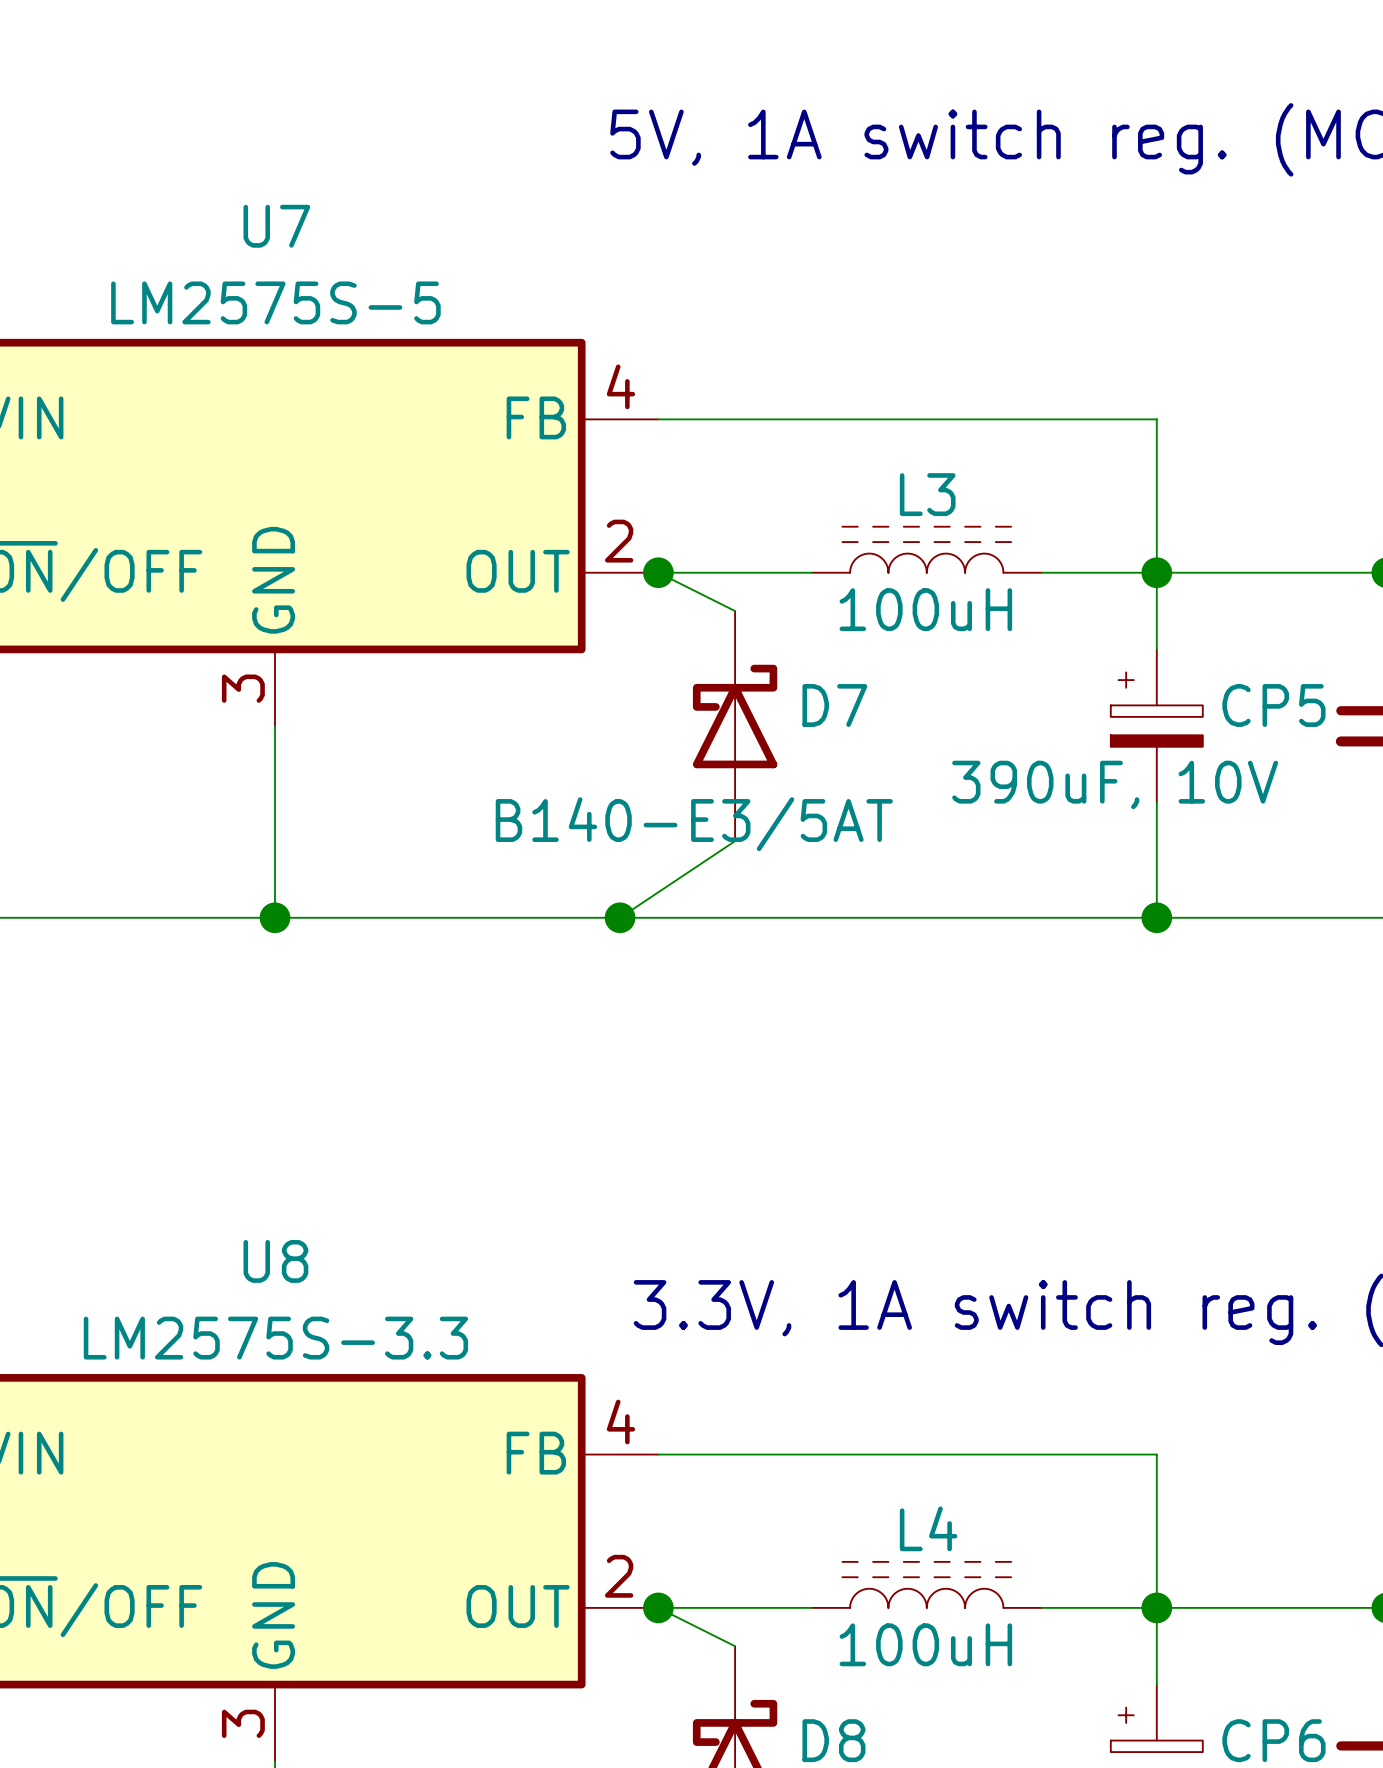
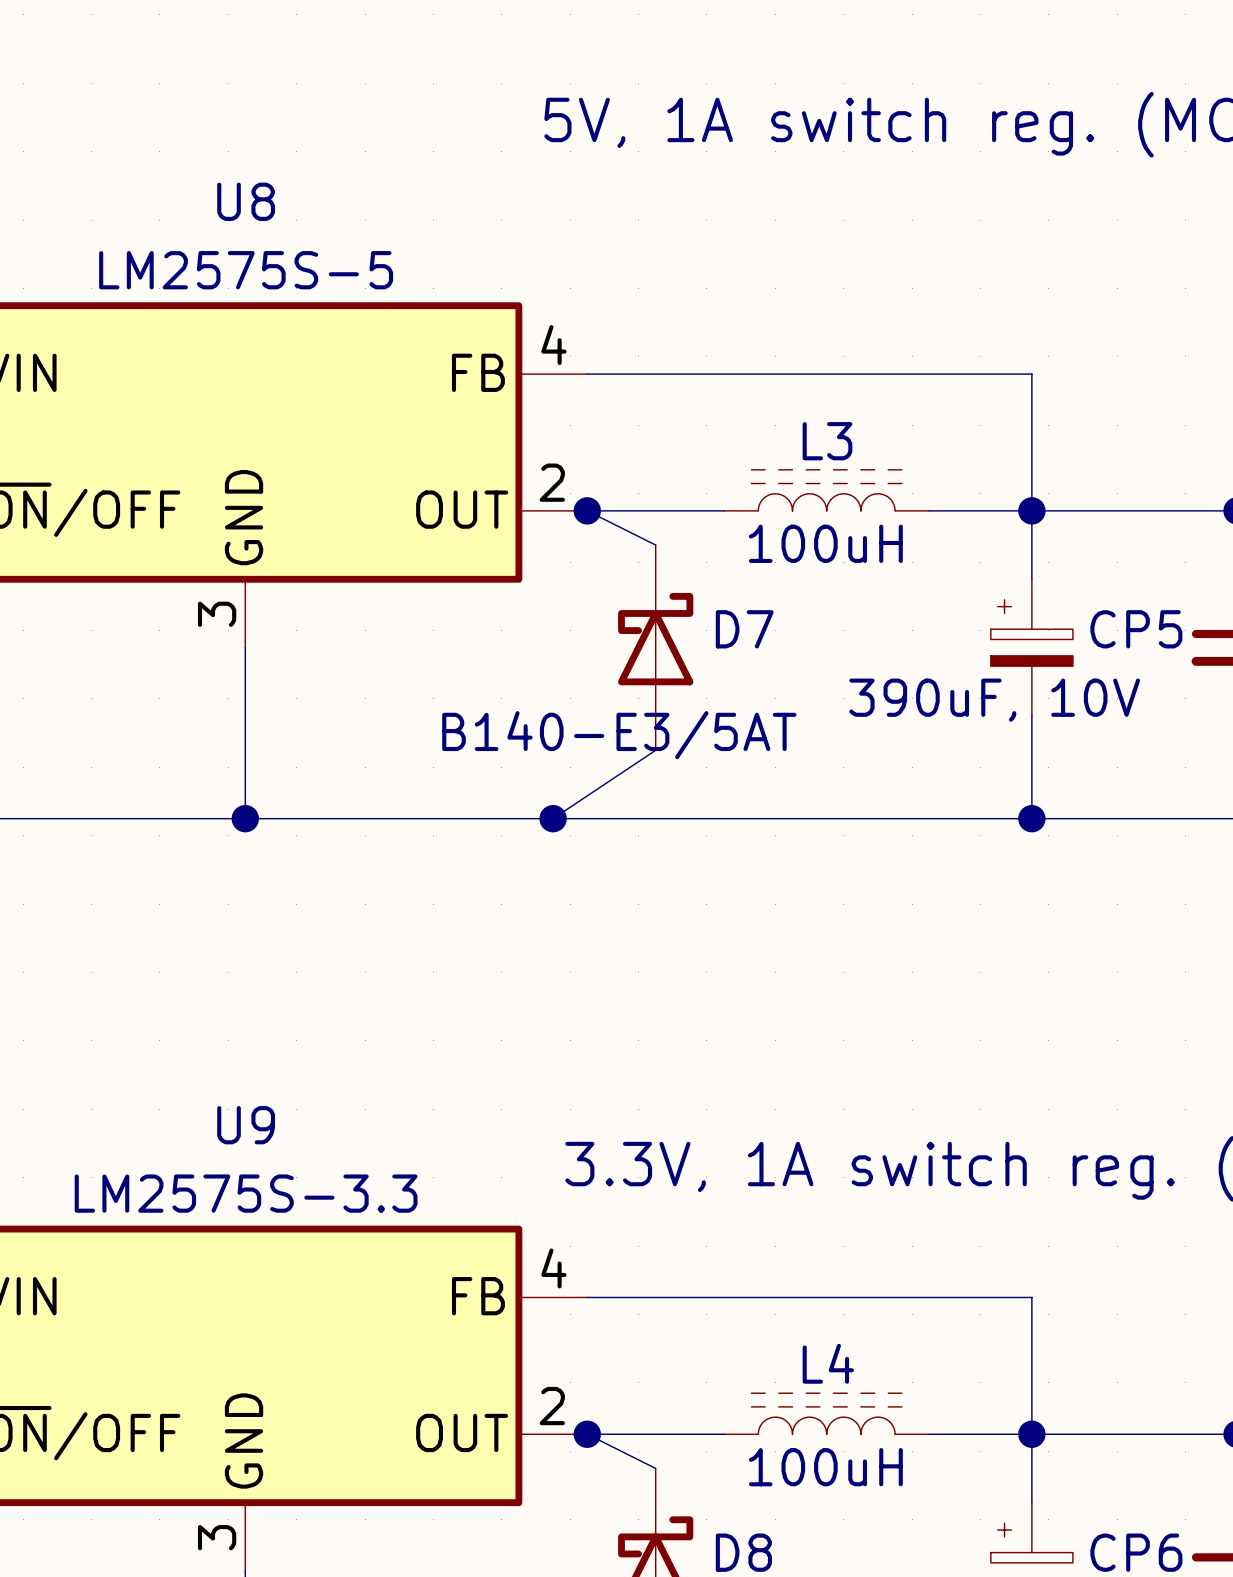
U7 name: U7 (276, 226) -> U8 (246, 201)
U8 name: U8 (275, 1261) -> U9 (246, 1125)

